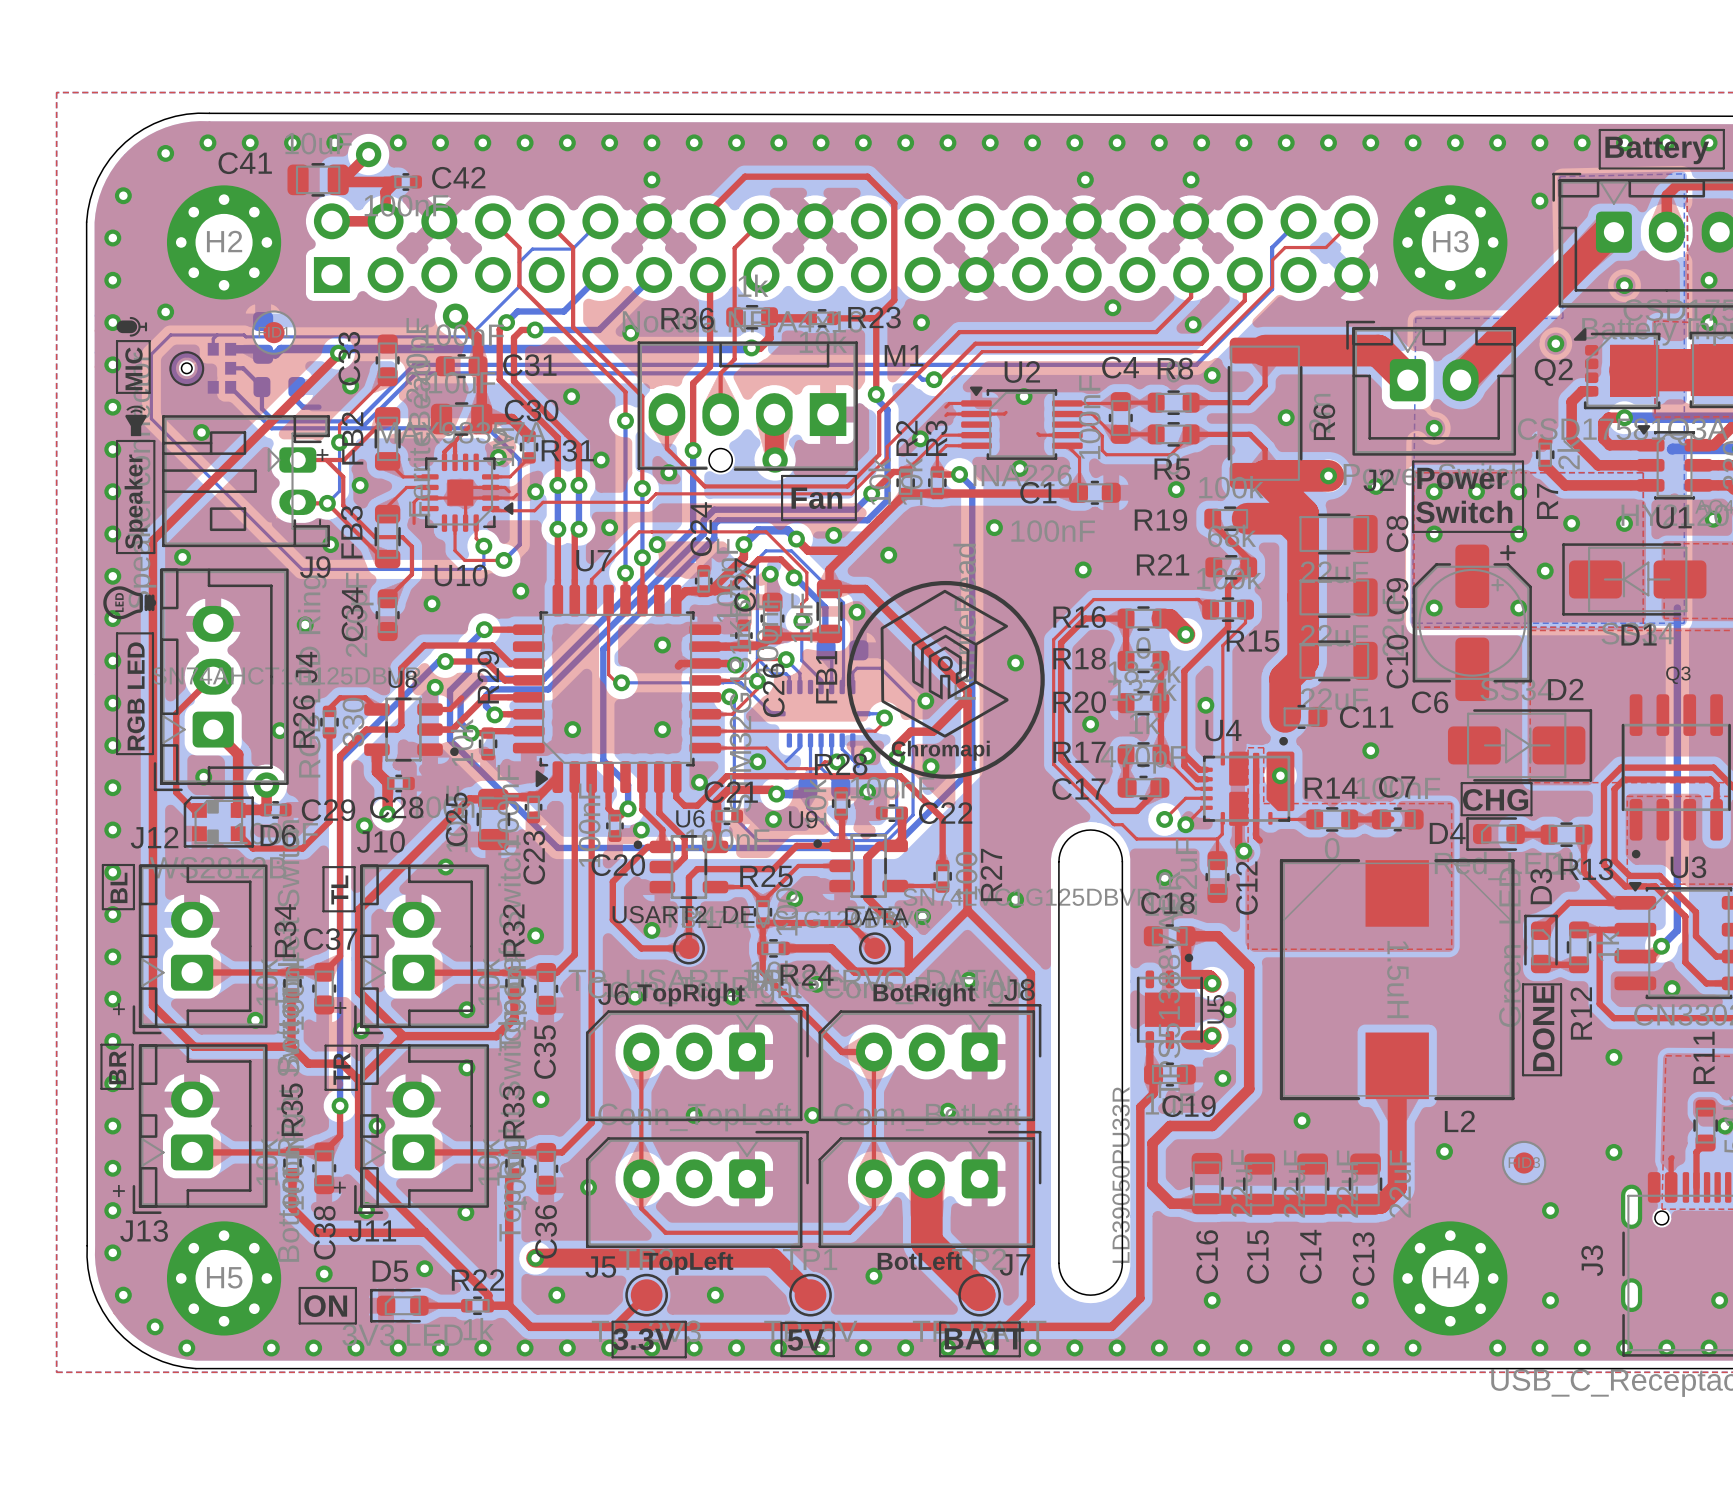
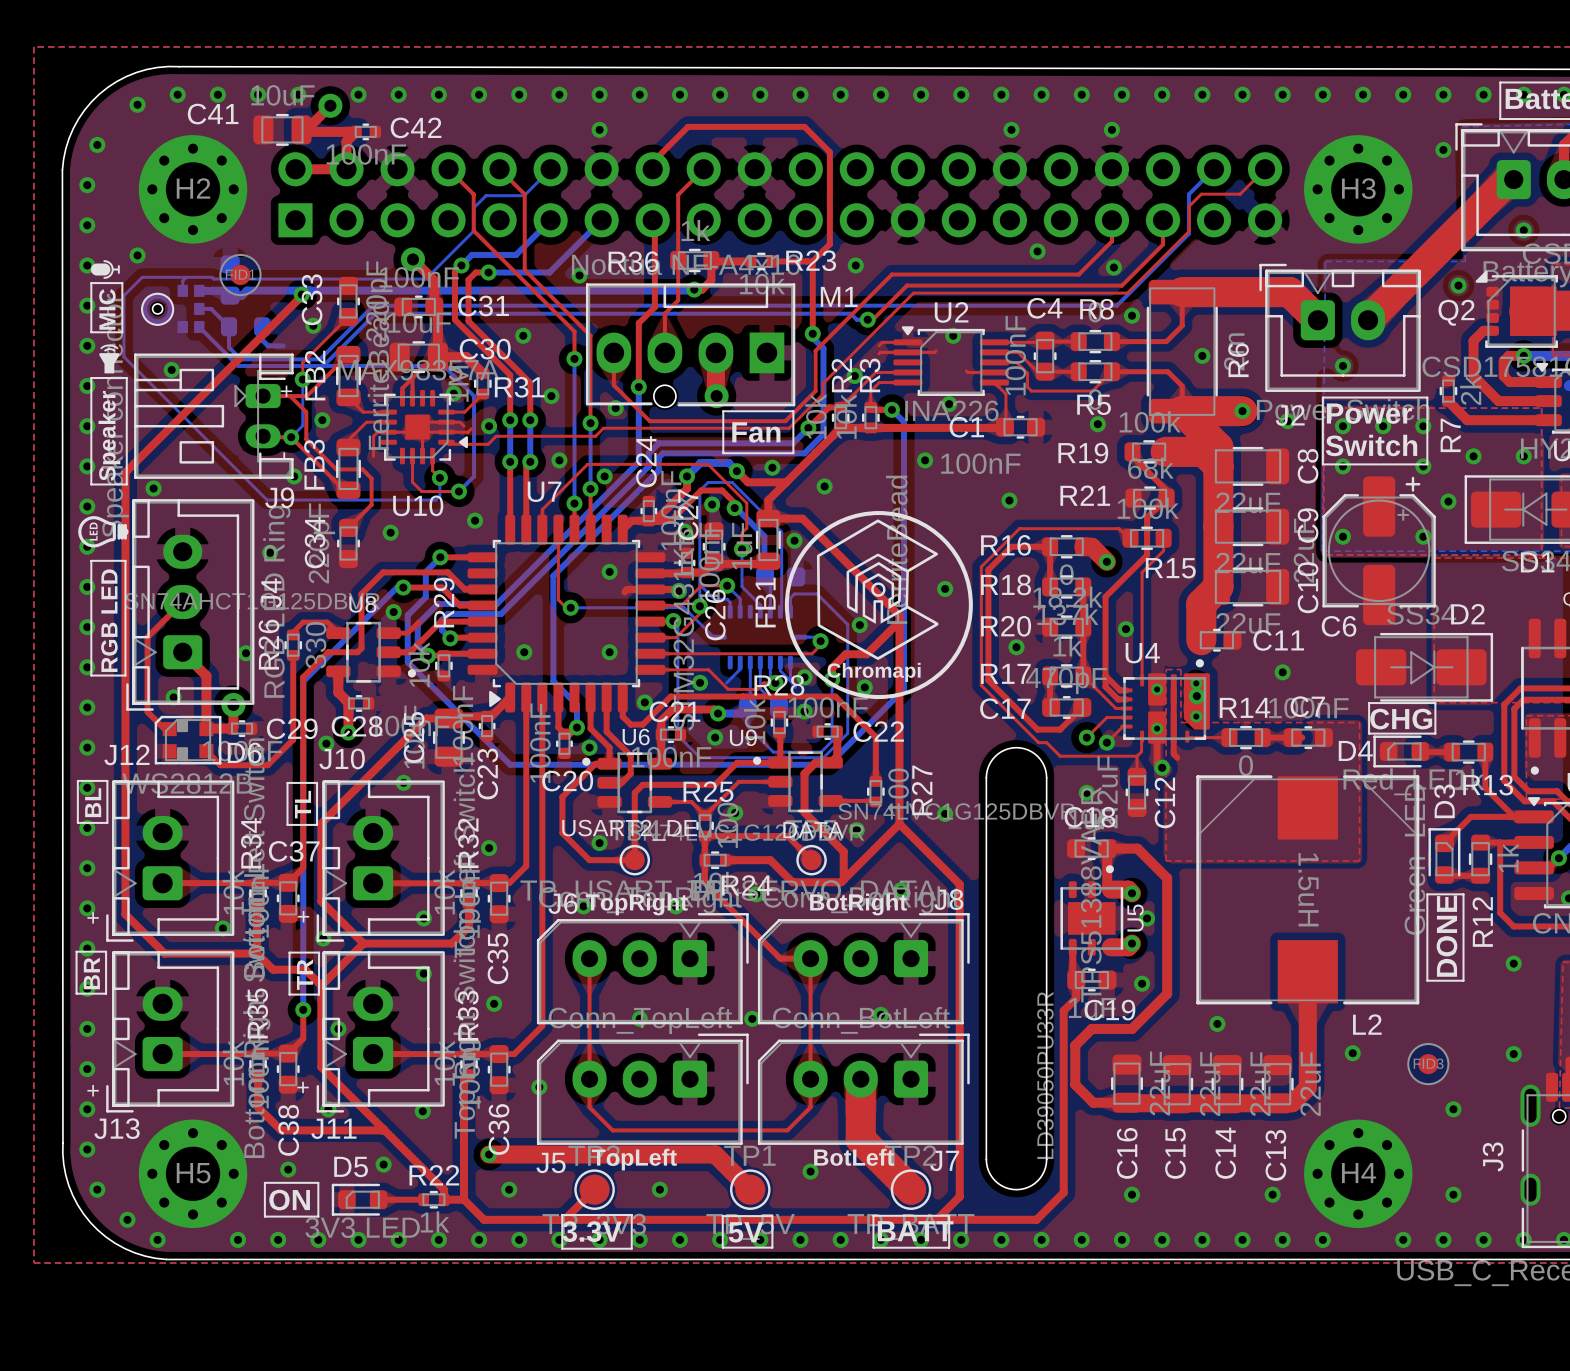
via: none -> (1196, 683)
via: none -> (1157, 689)
via: none -> (1196, 716)
via: none -> (1157, 728)

